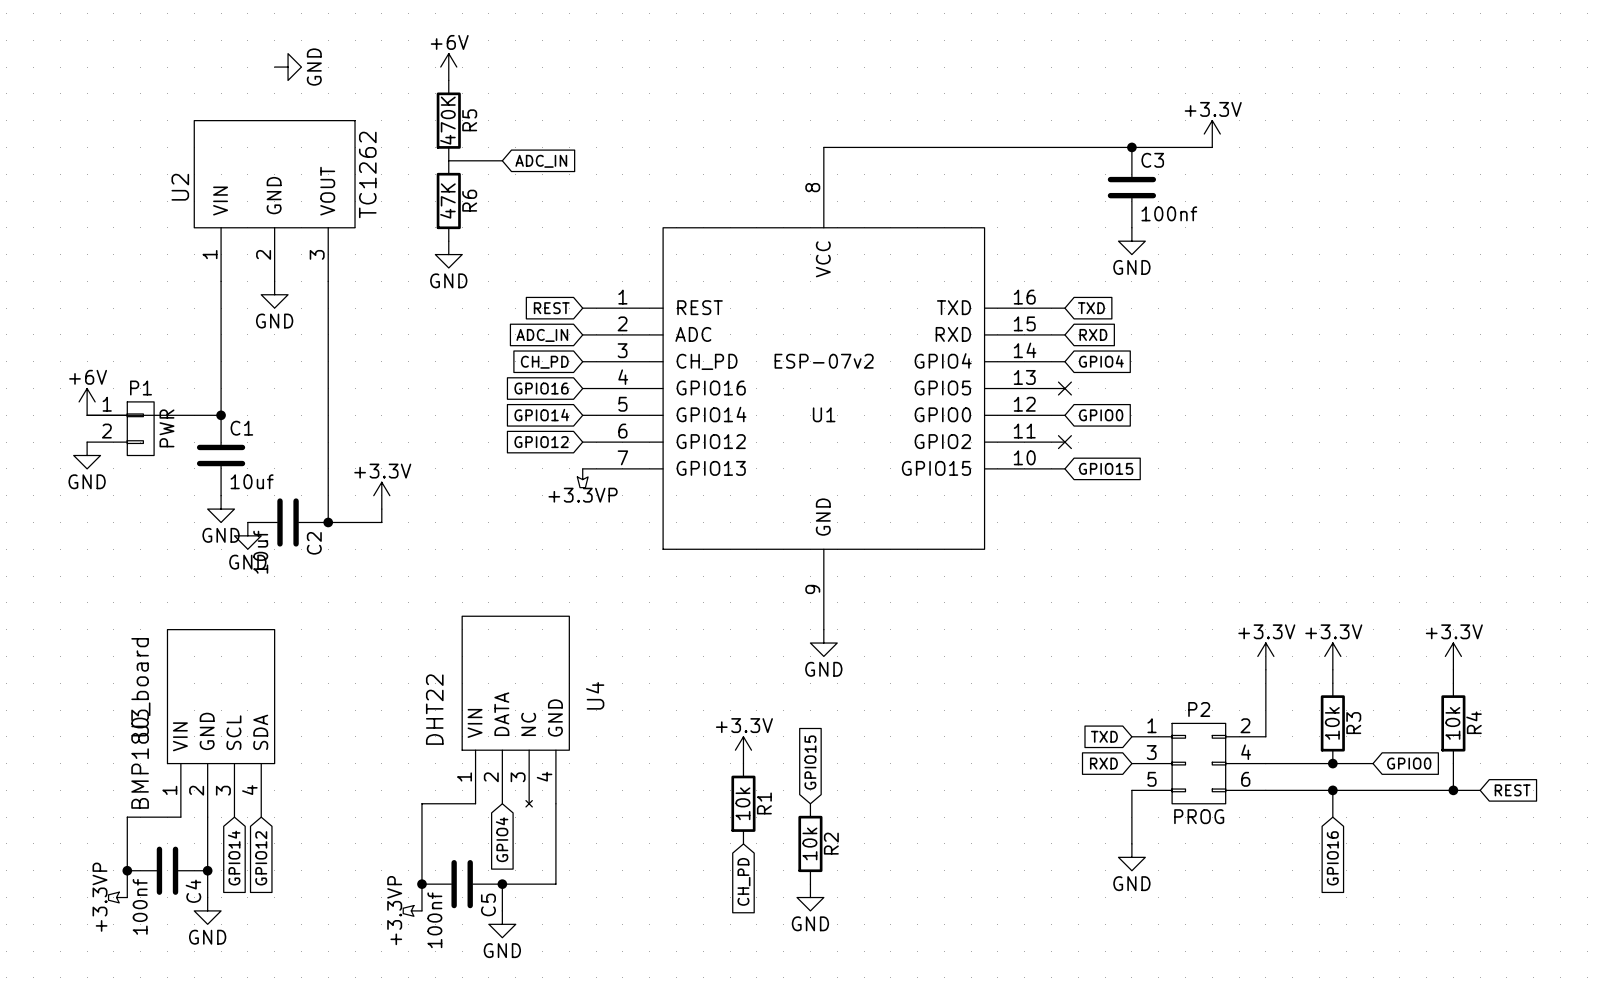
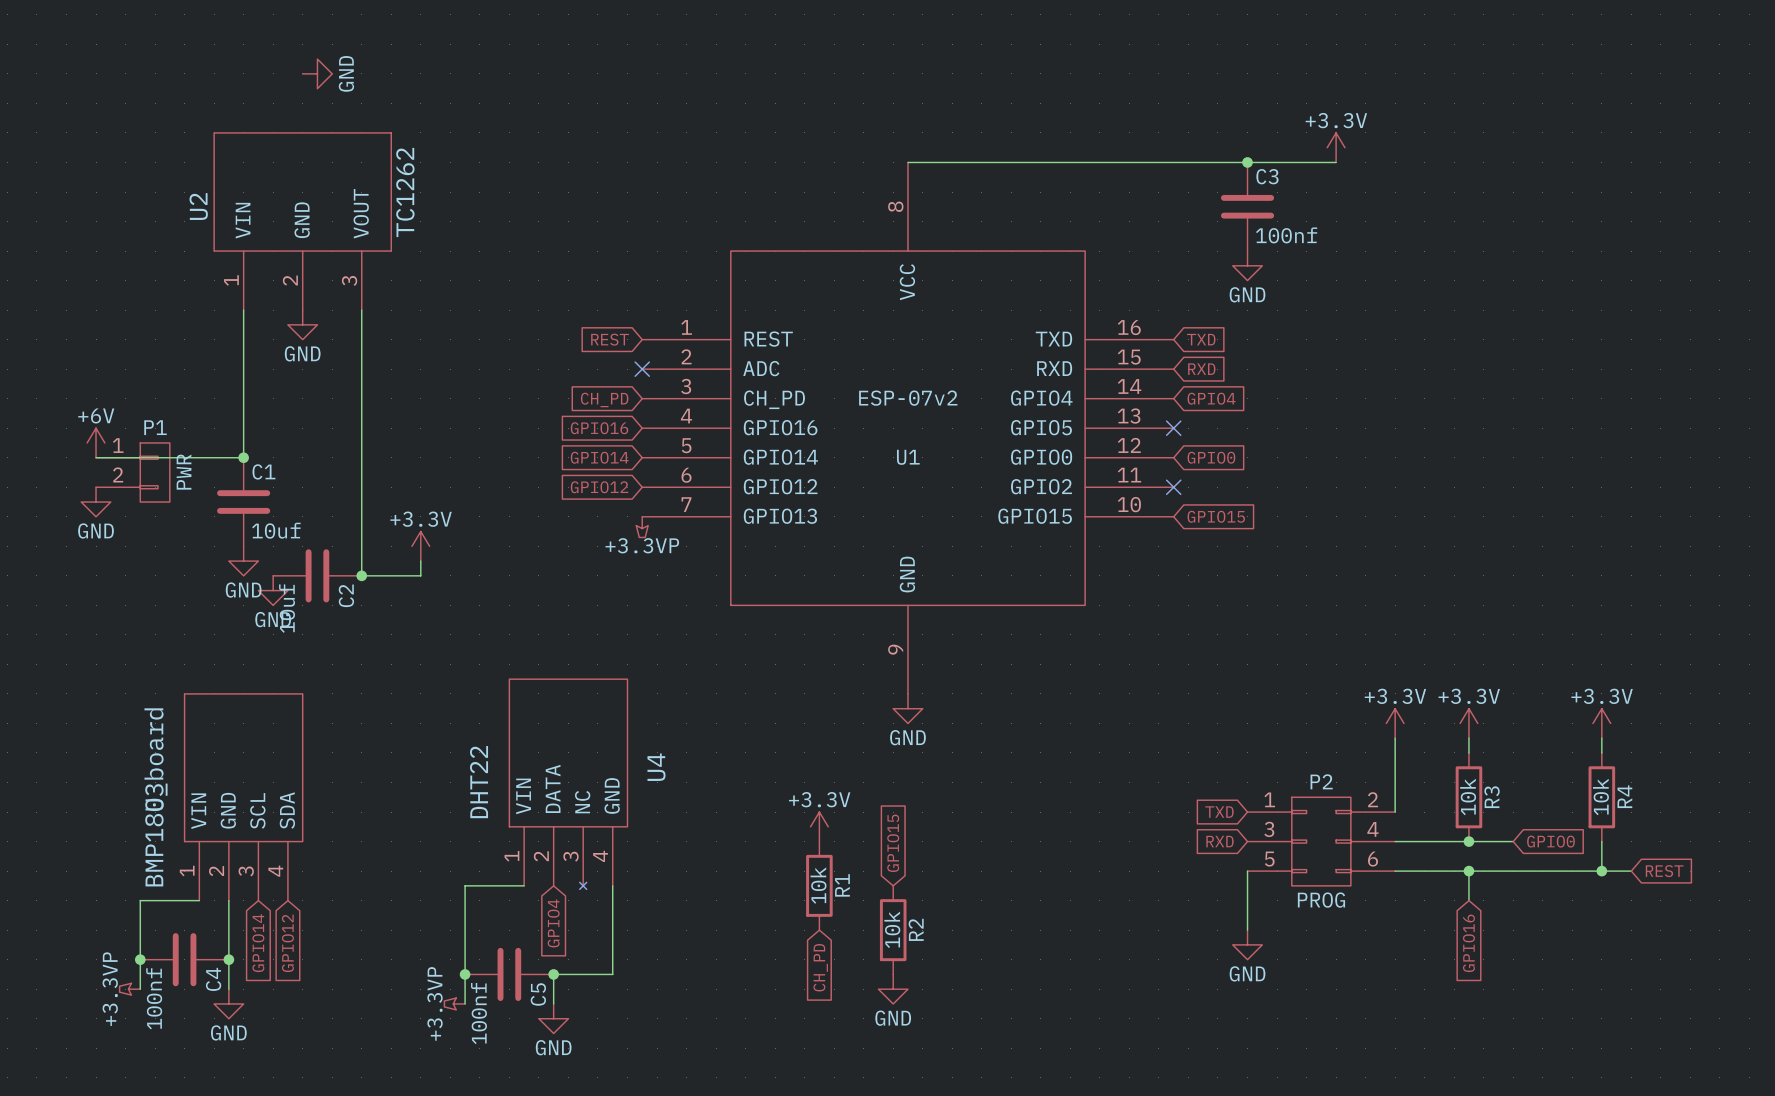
power symbol: +6V (448, 67) -> none
R5: 470K (448, 120) -> none
wire: (448, 160) (502, 160) -> none
global label: ADC_IN (541, 161) -> none
R6: 47K (448, 201) -> none
power symbol: GND (448, 254) -> none
no-connect mark: none -> (642, 369)
global label: ADC_IN (542, 335) -> none

